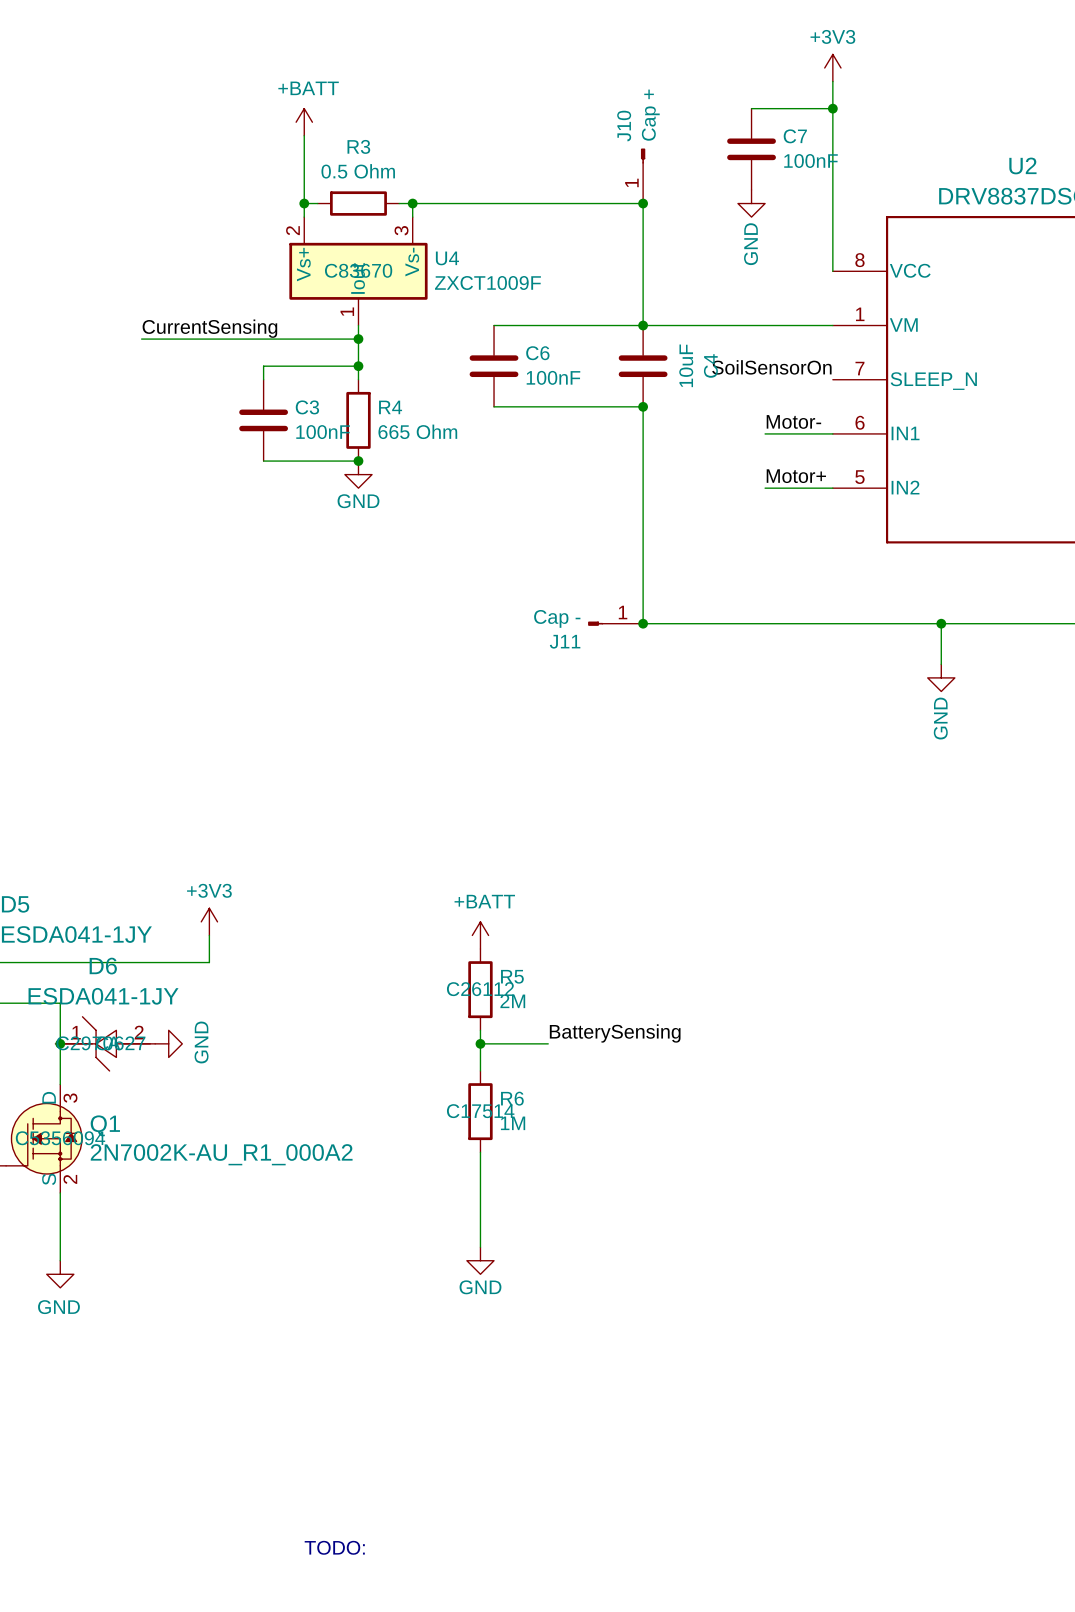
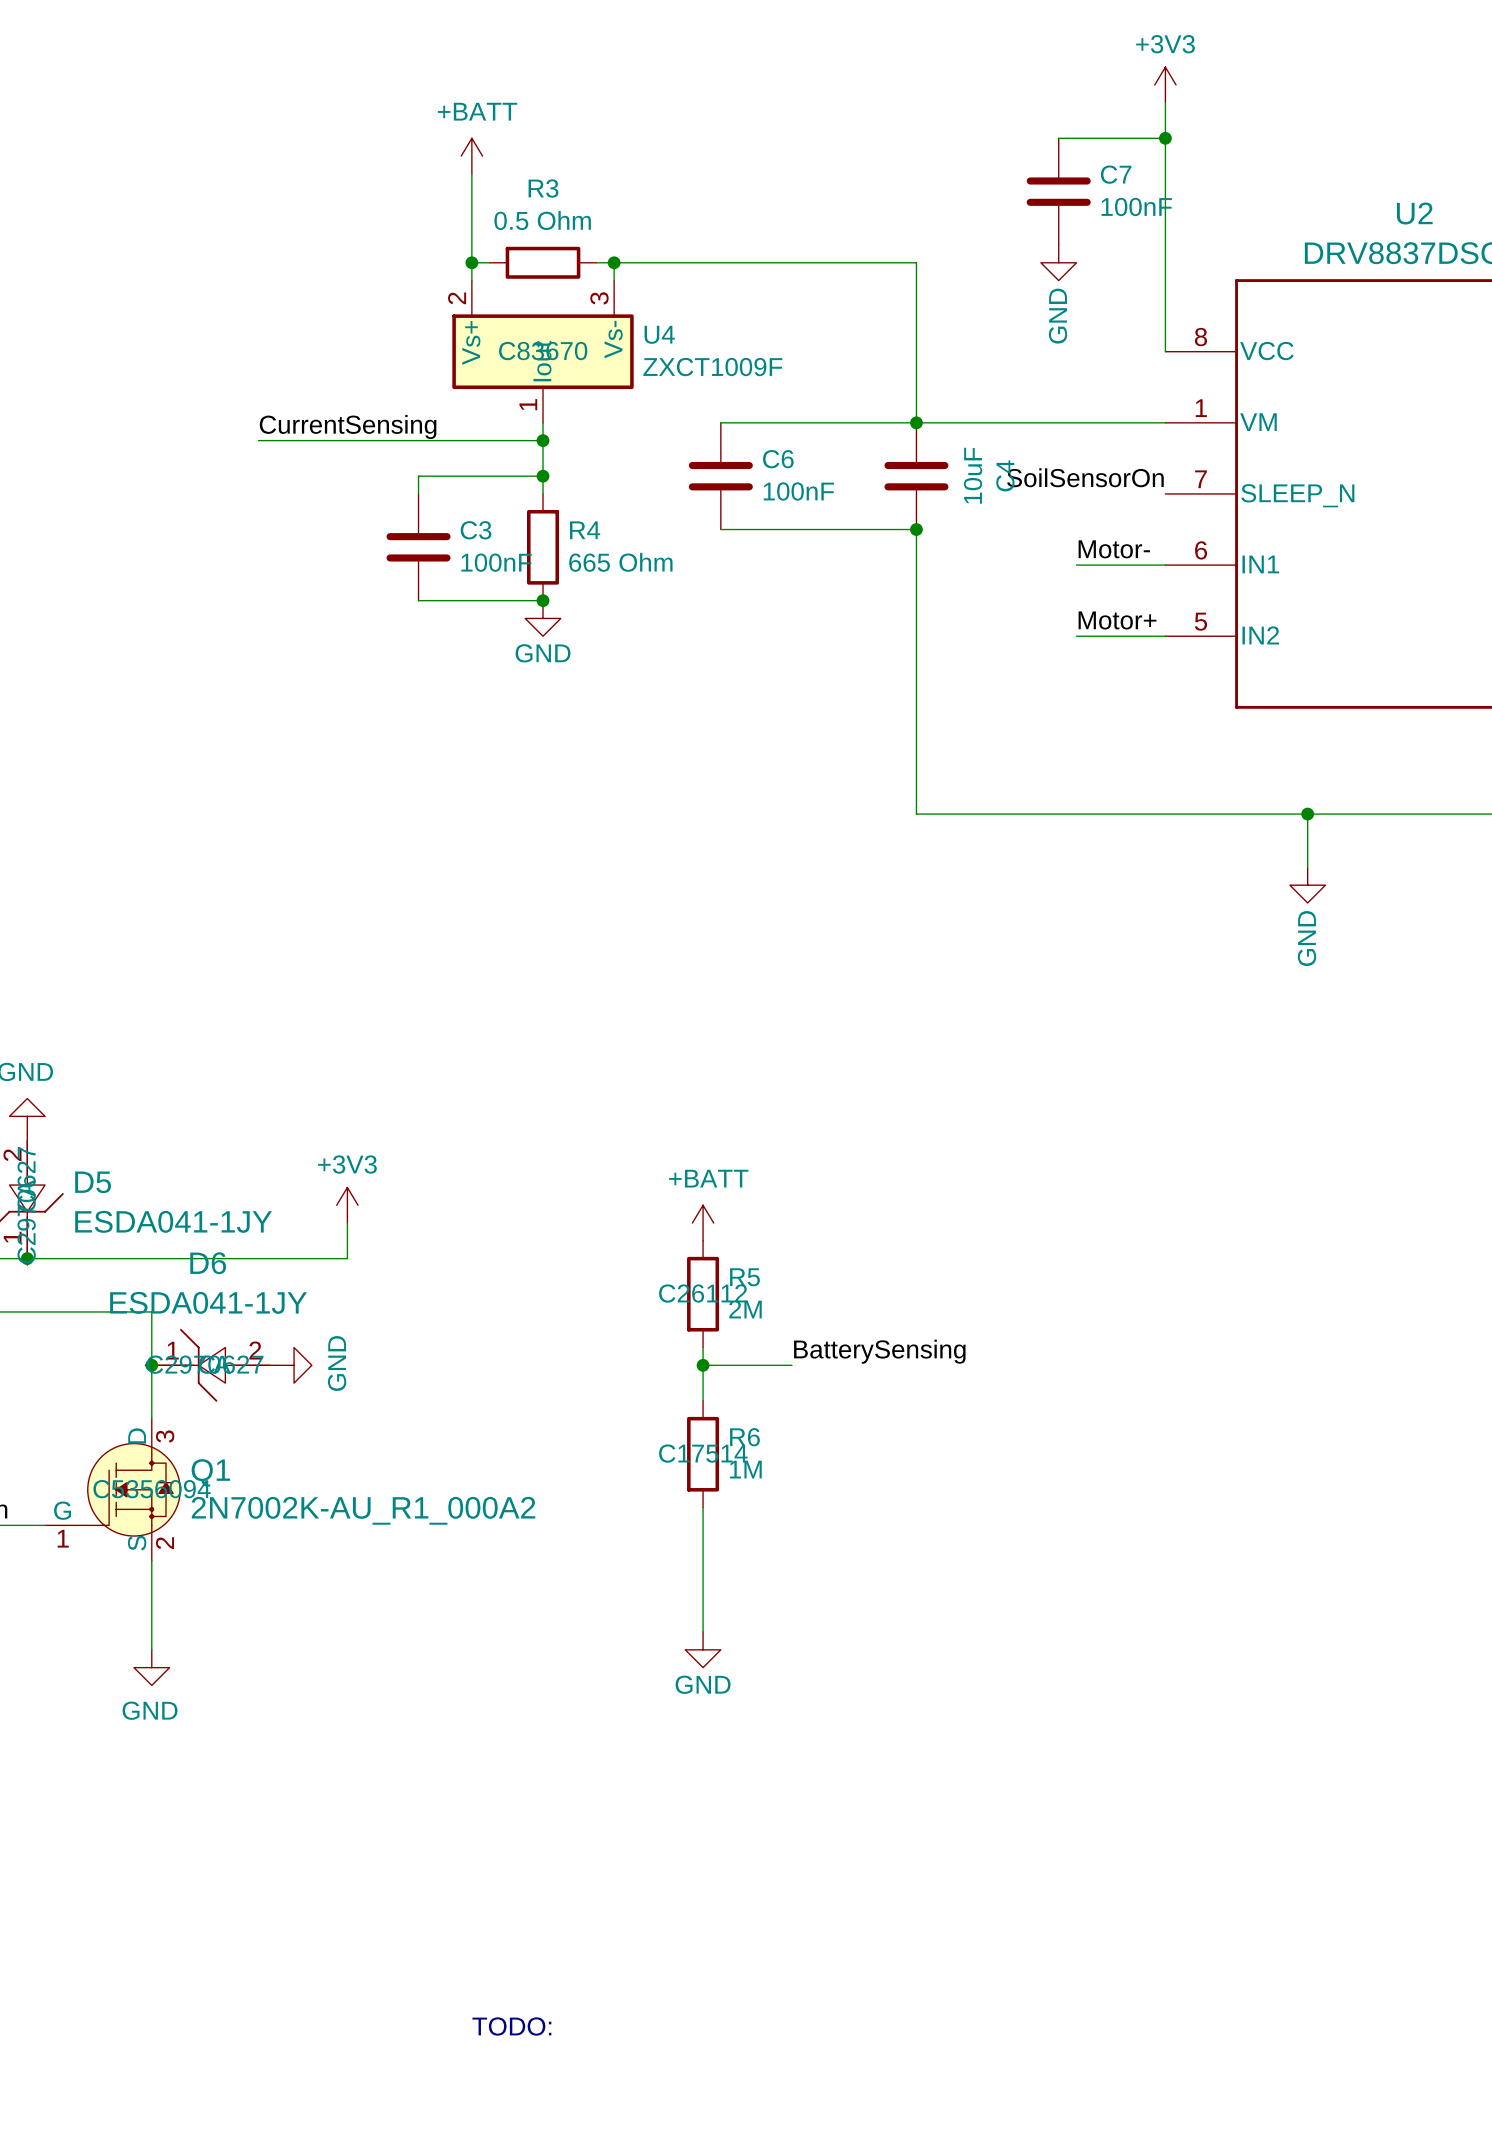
J10: Cap + (643, 176) -> none
junction: (643, 203) -> none
J11: Cap - (615, 623) -> none
junction: (643, 623) -> none

